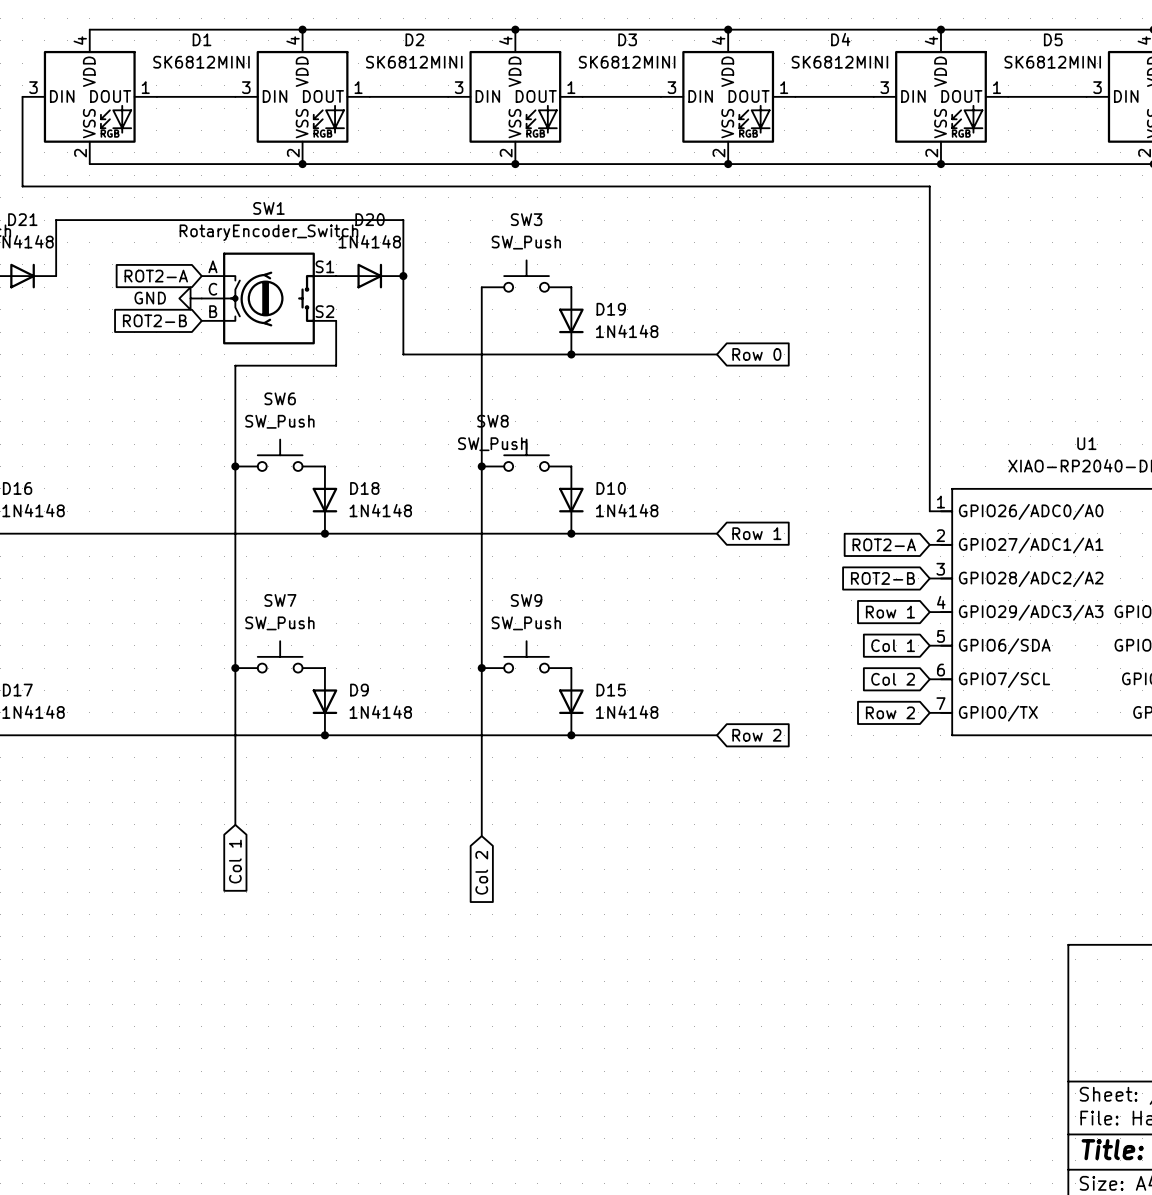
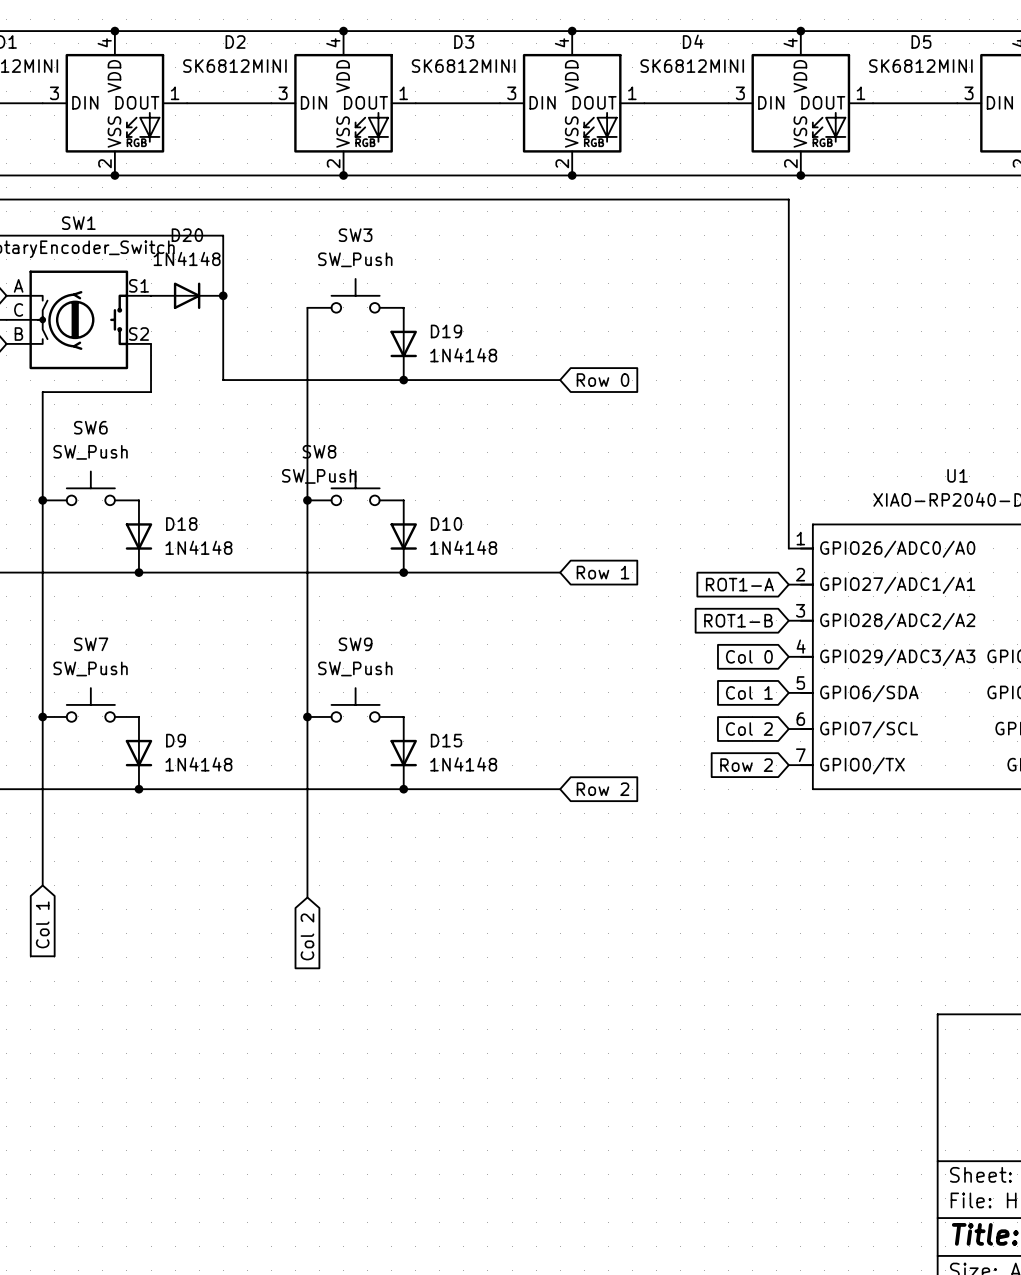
global label: ROT2-A (884, 544) -> ROT1-A (739, 584)
global label: ROT2-B (882, 578) -> ROT1-B (738, 620)
global label: Row 1 (890, 612) -> Col 0 (749, 656)

